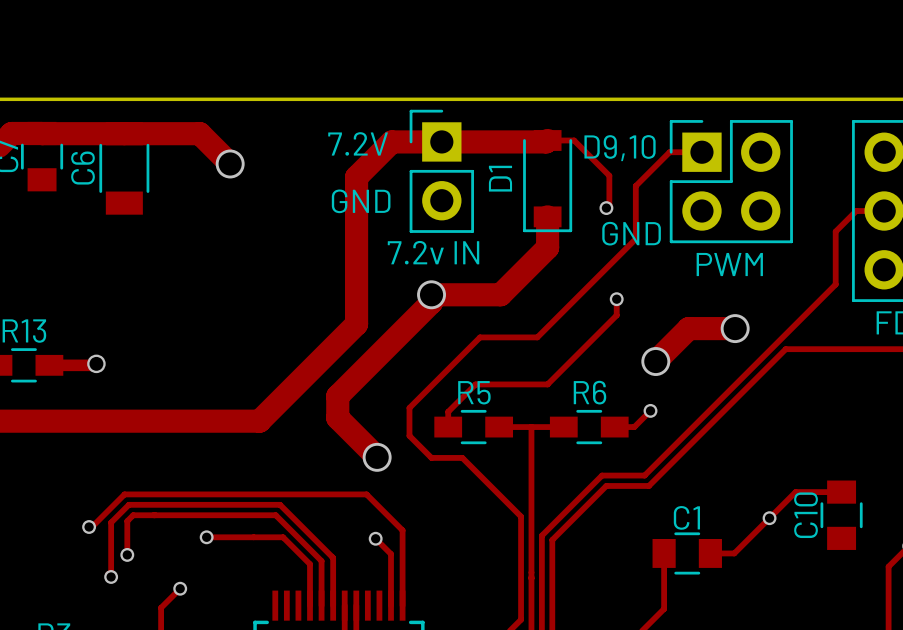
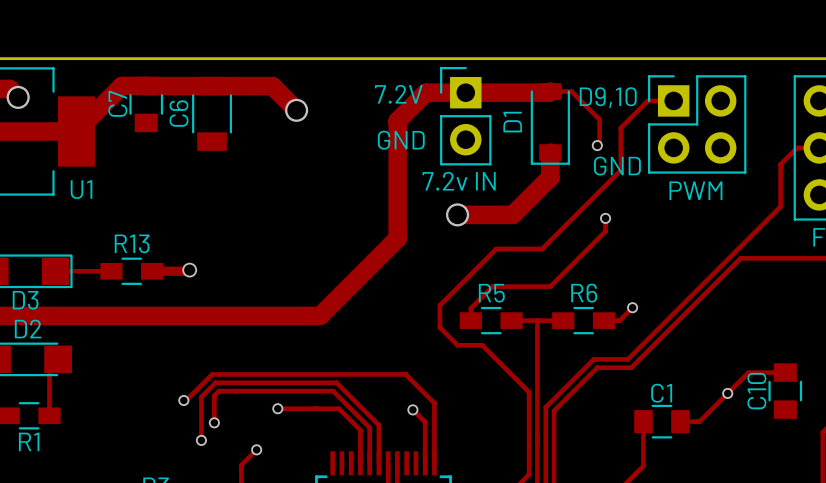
track: (431, 294) (431, 302) (337, 396) (337, 417) (377, 457) -> none
track: (735, 328) (688, 328) (655, 361) -> none
via: (735, 328) -> none
via: (655, 361) -> none
via: (377, 457) -> none

